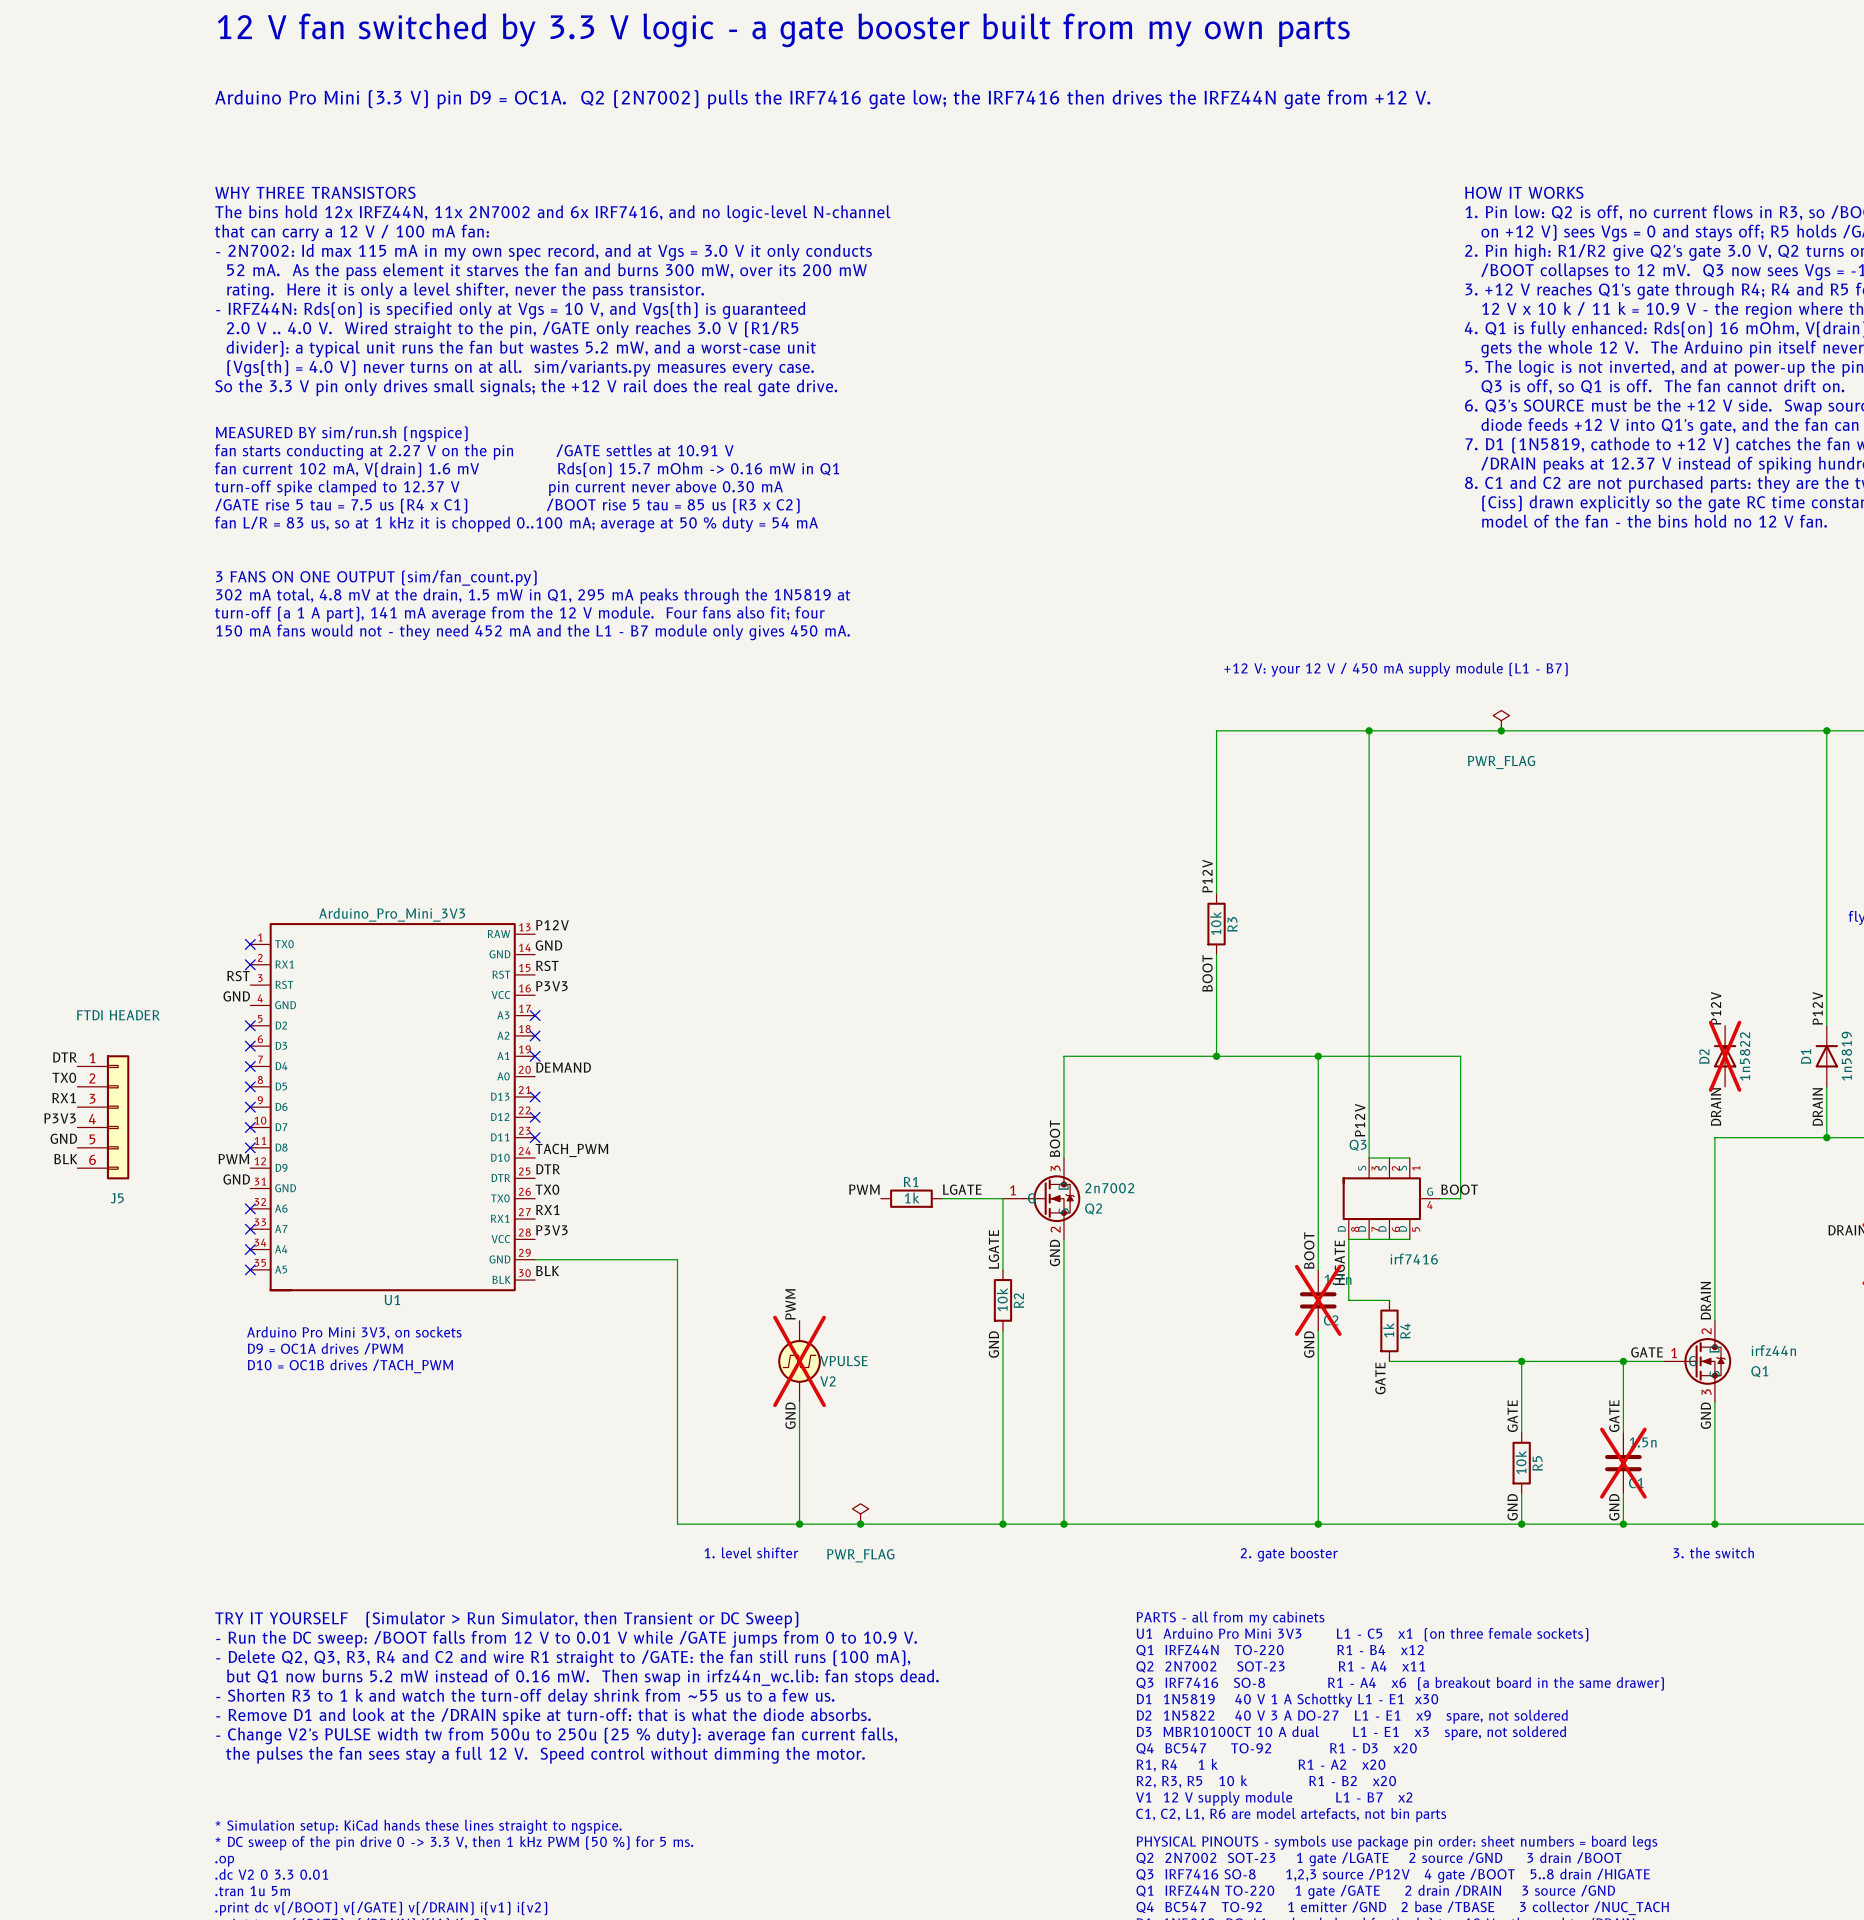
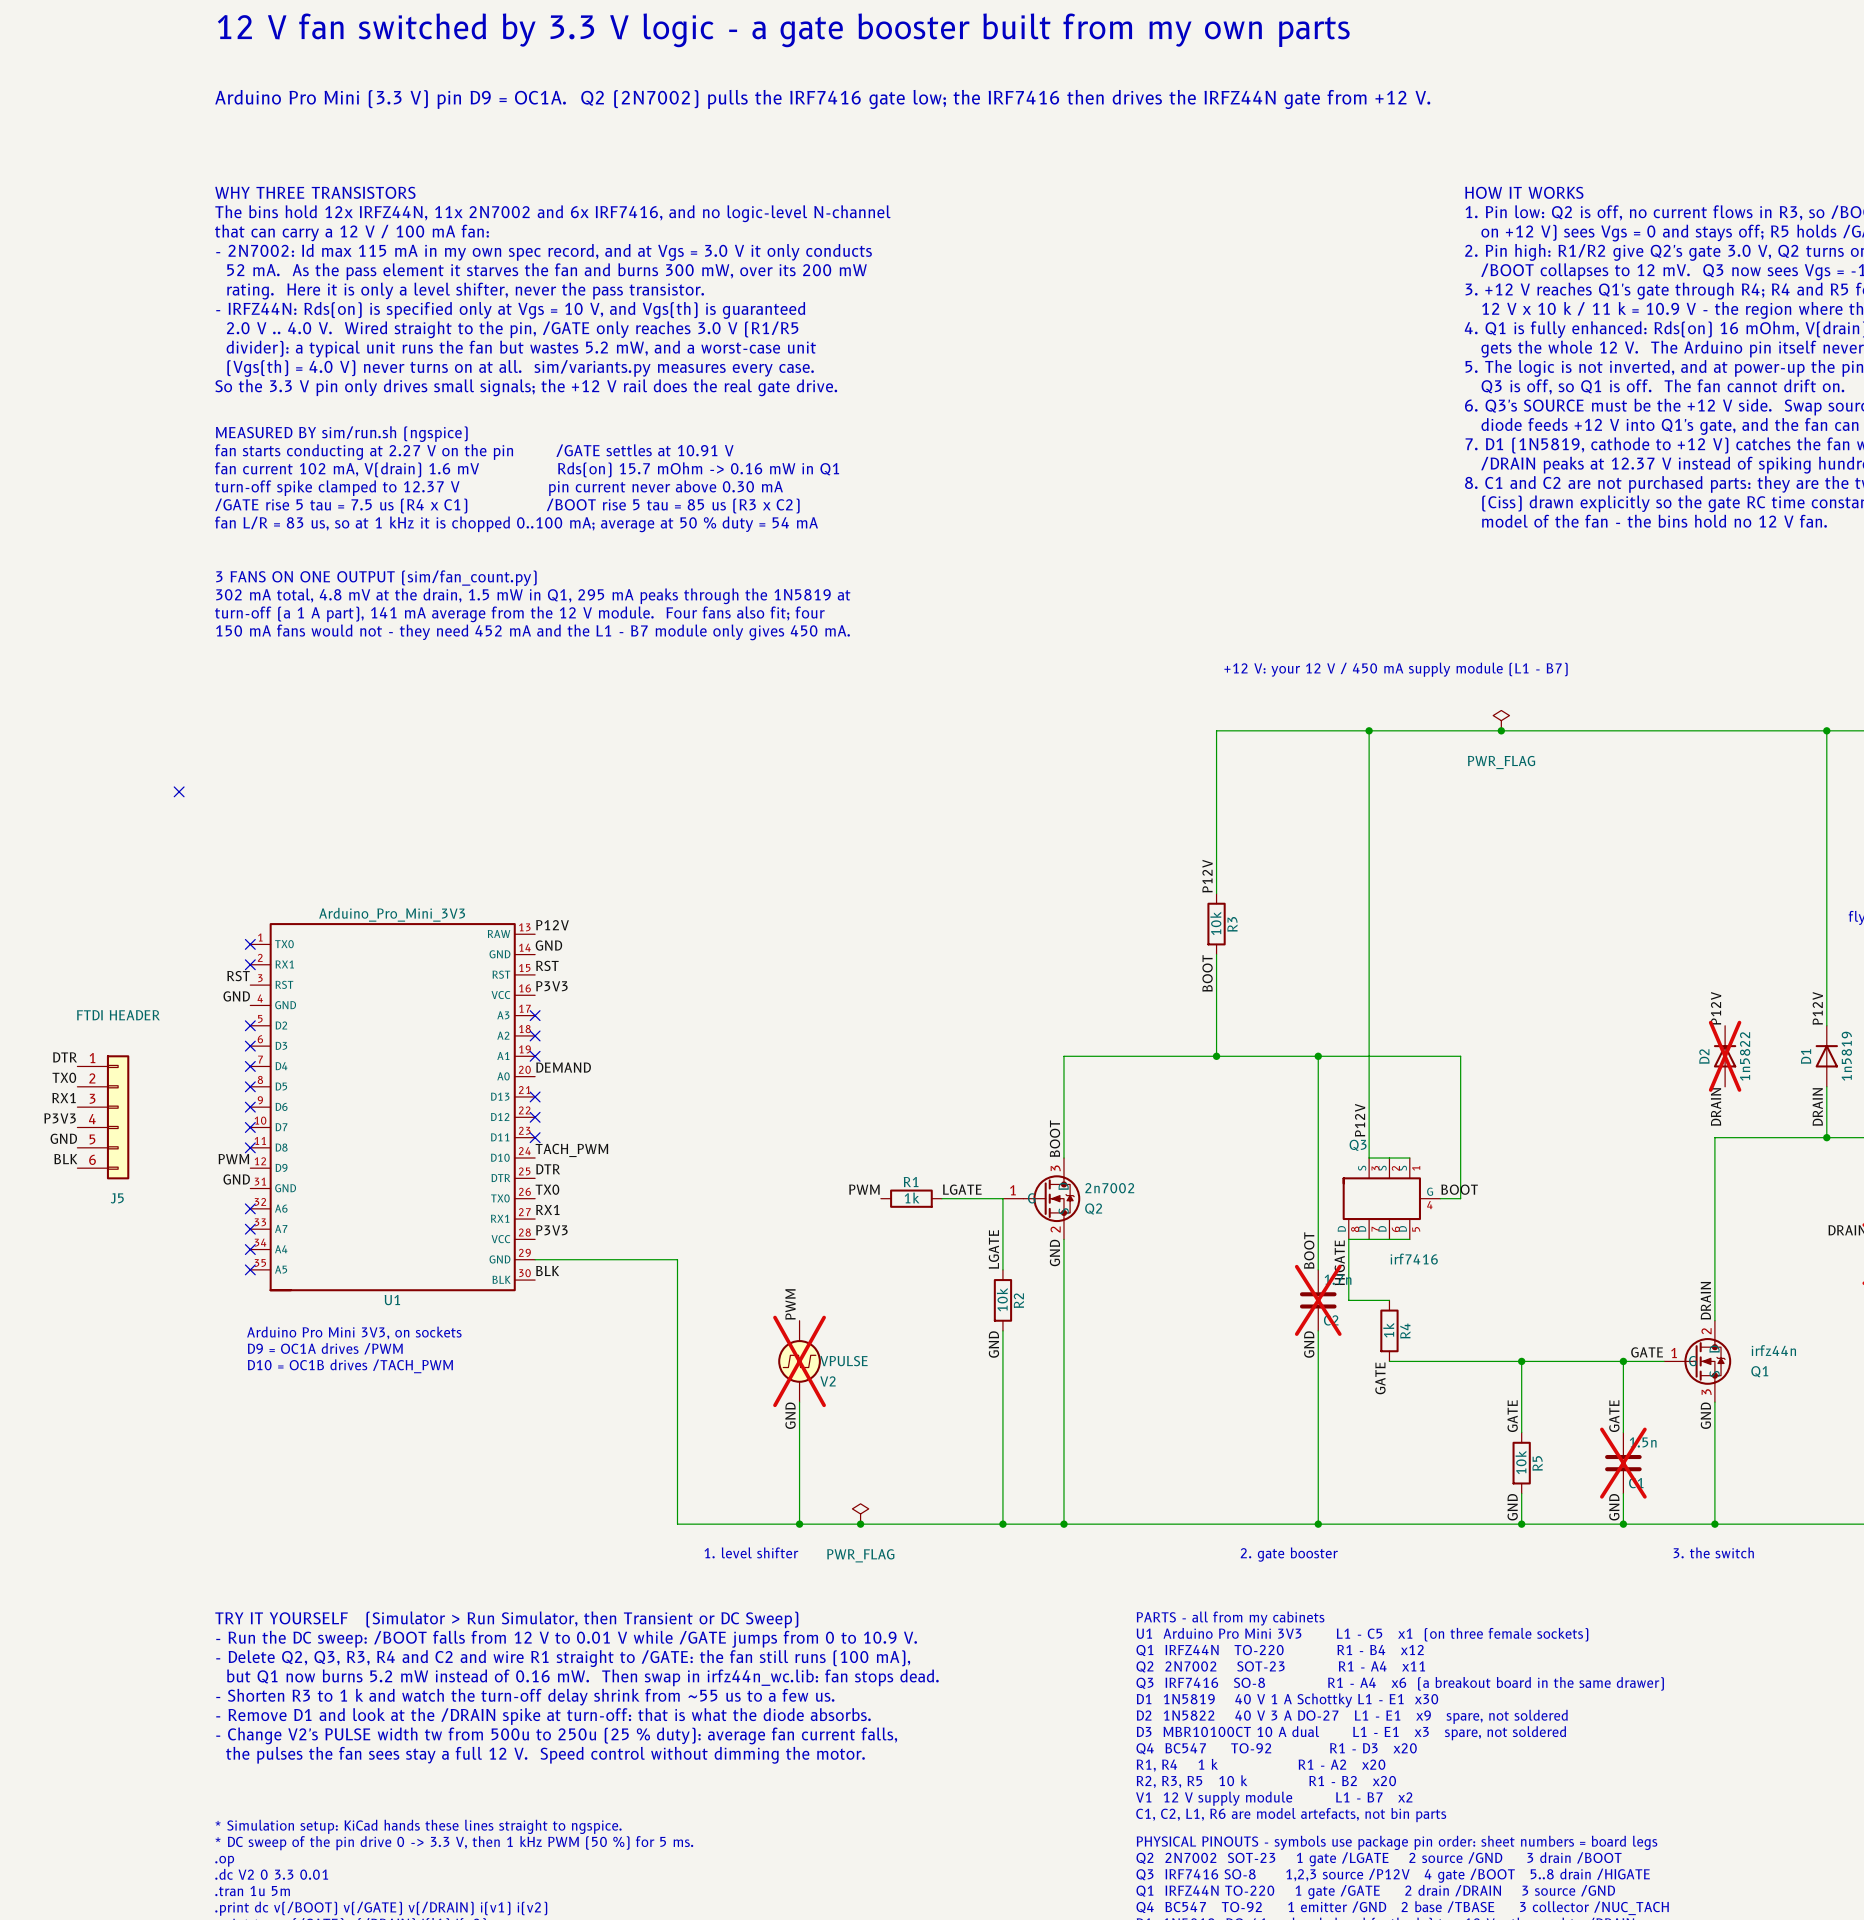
no-connect mark: none -> (179, 791)

